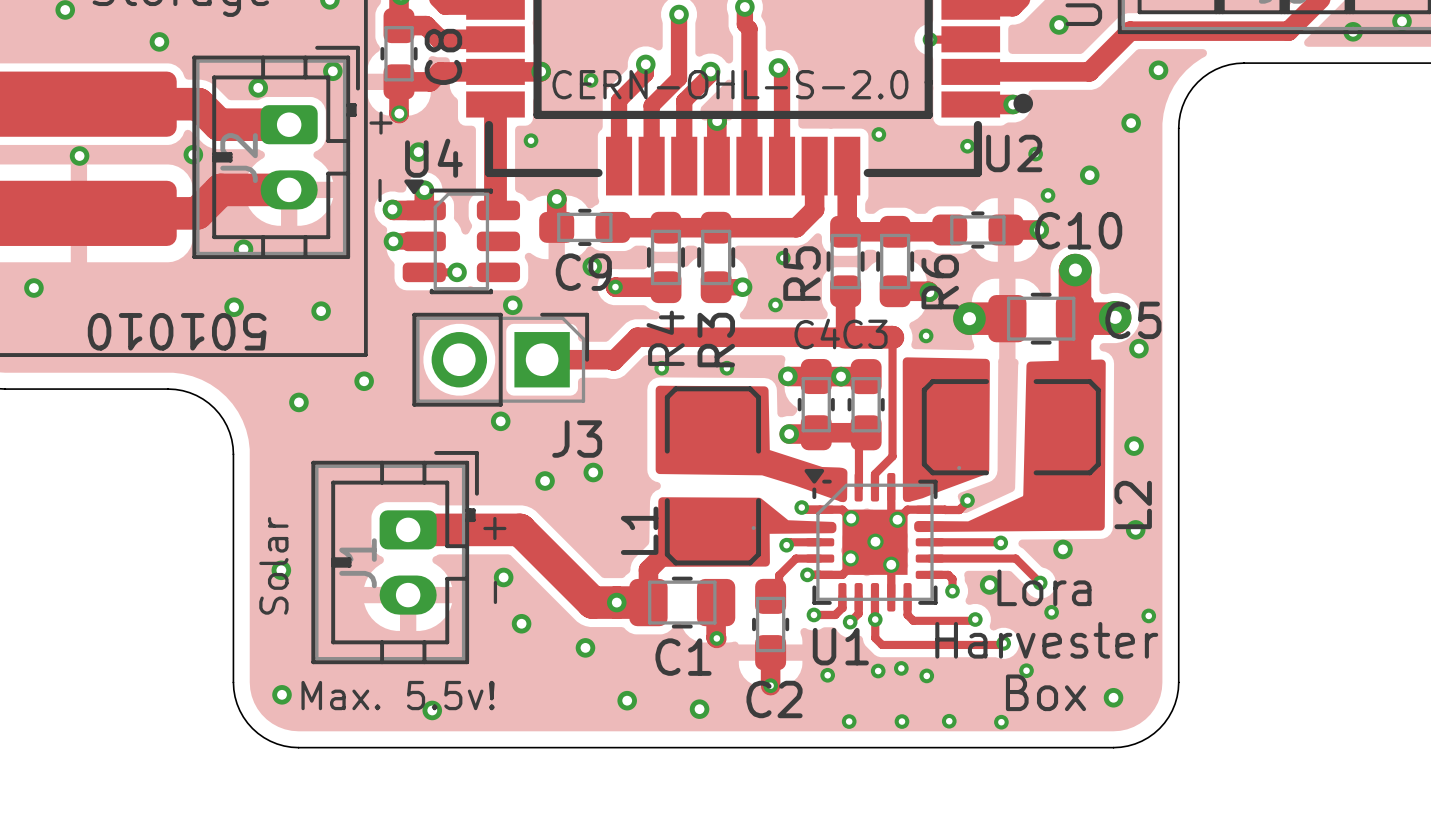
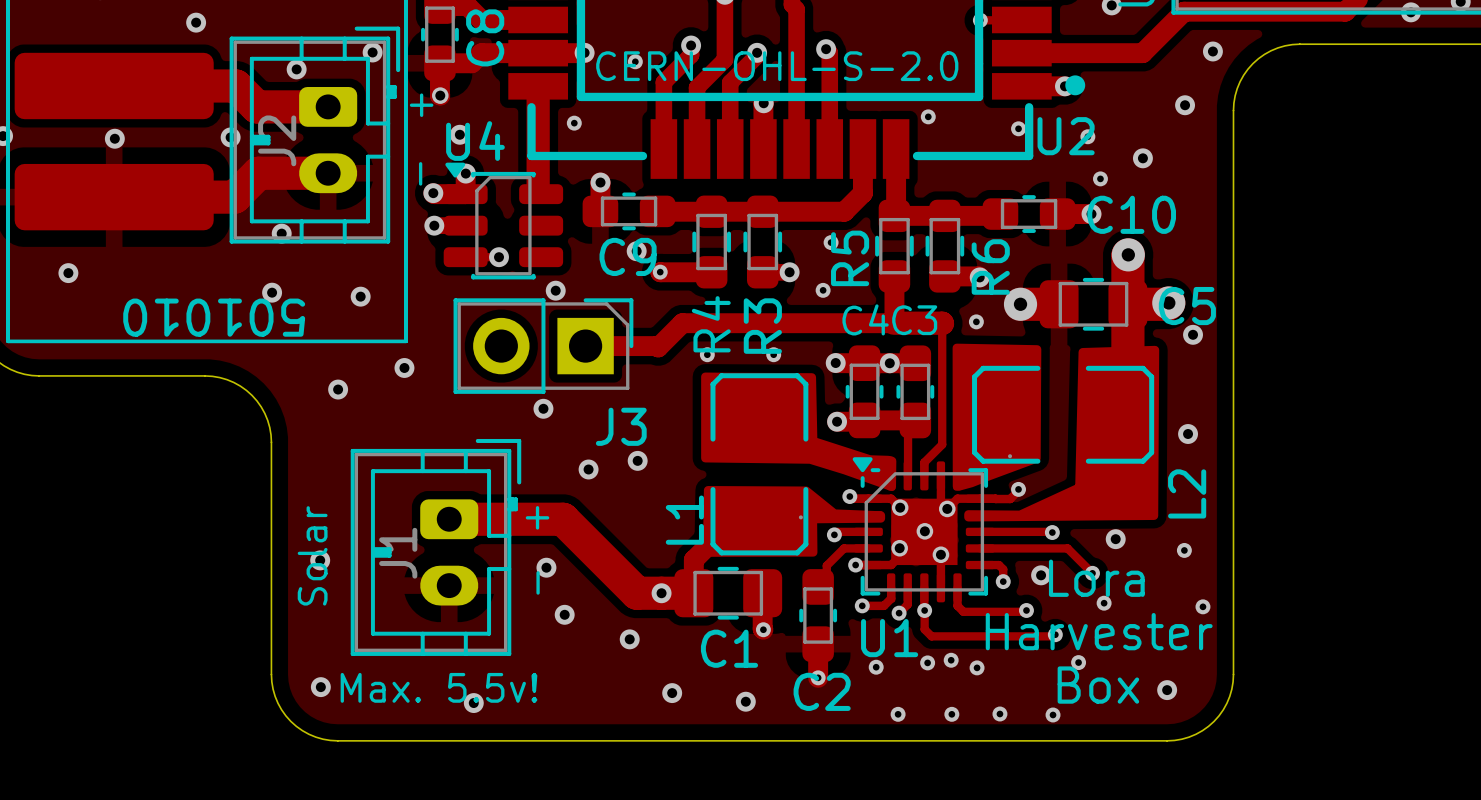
via: (1135, 529) -> none
via: none -> (1184, 550)

